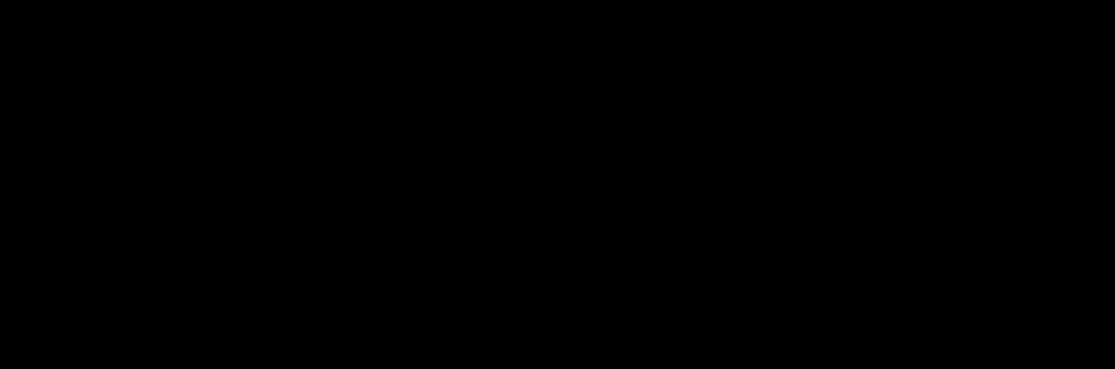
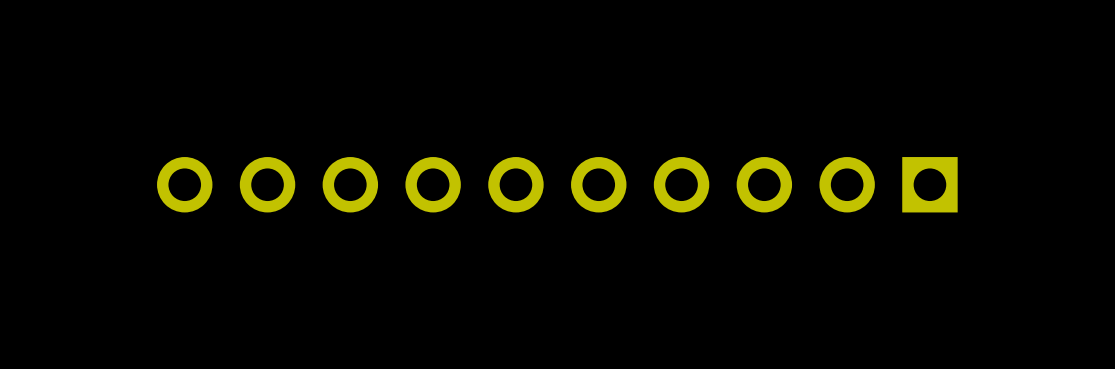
part: none -> (557, 184)

